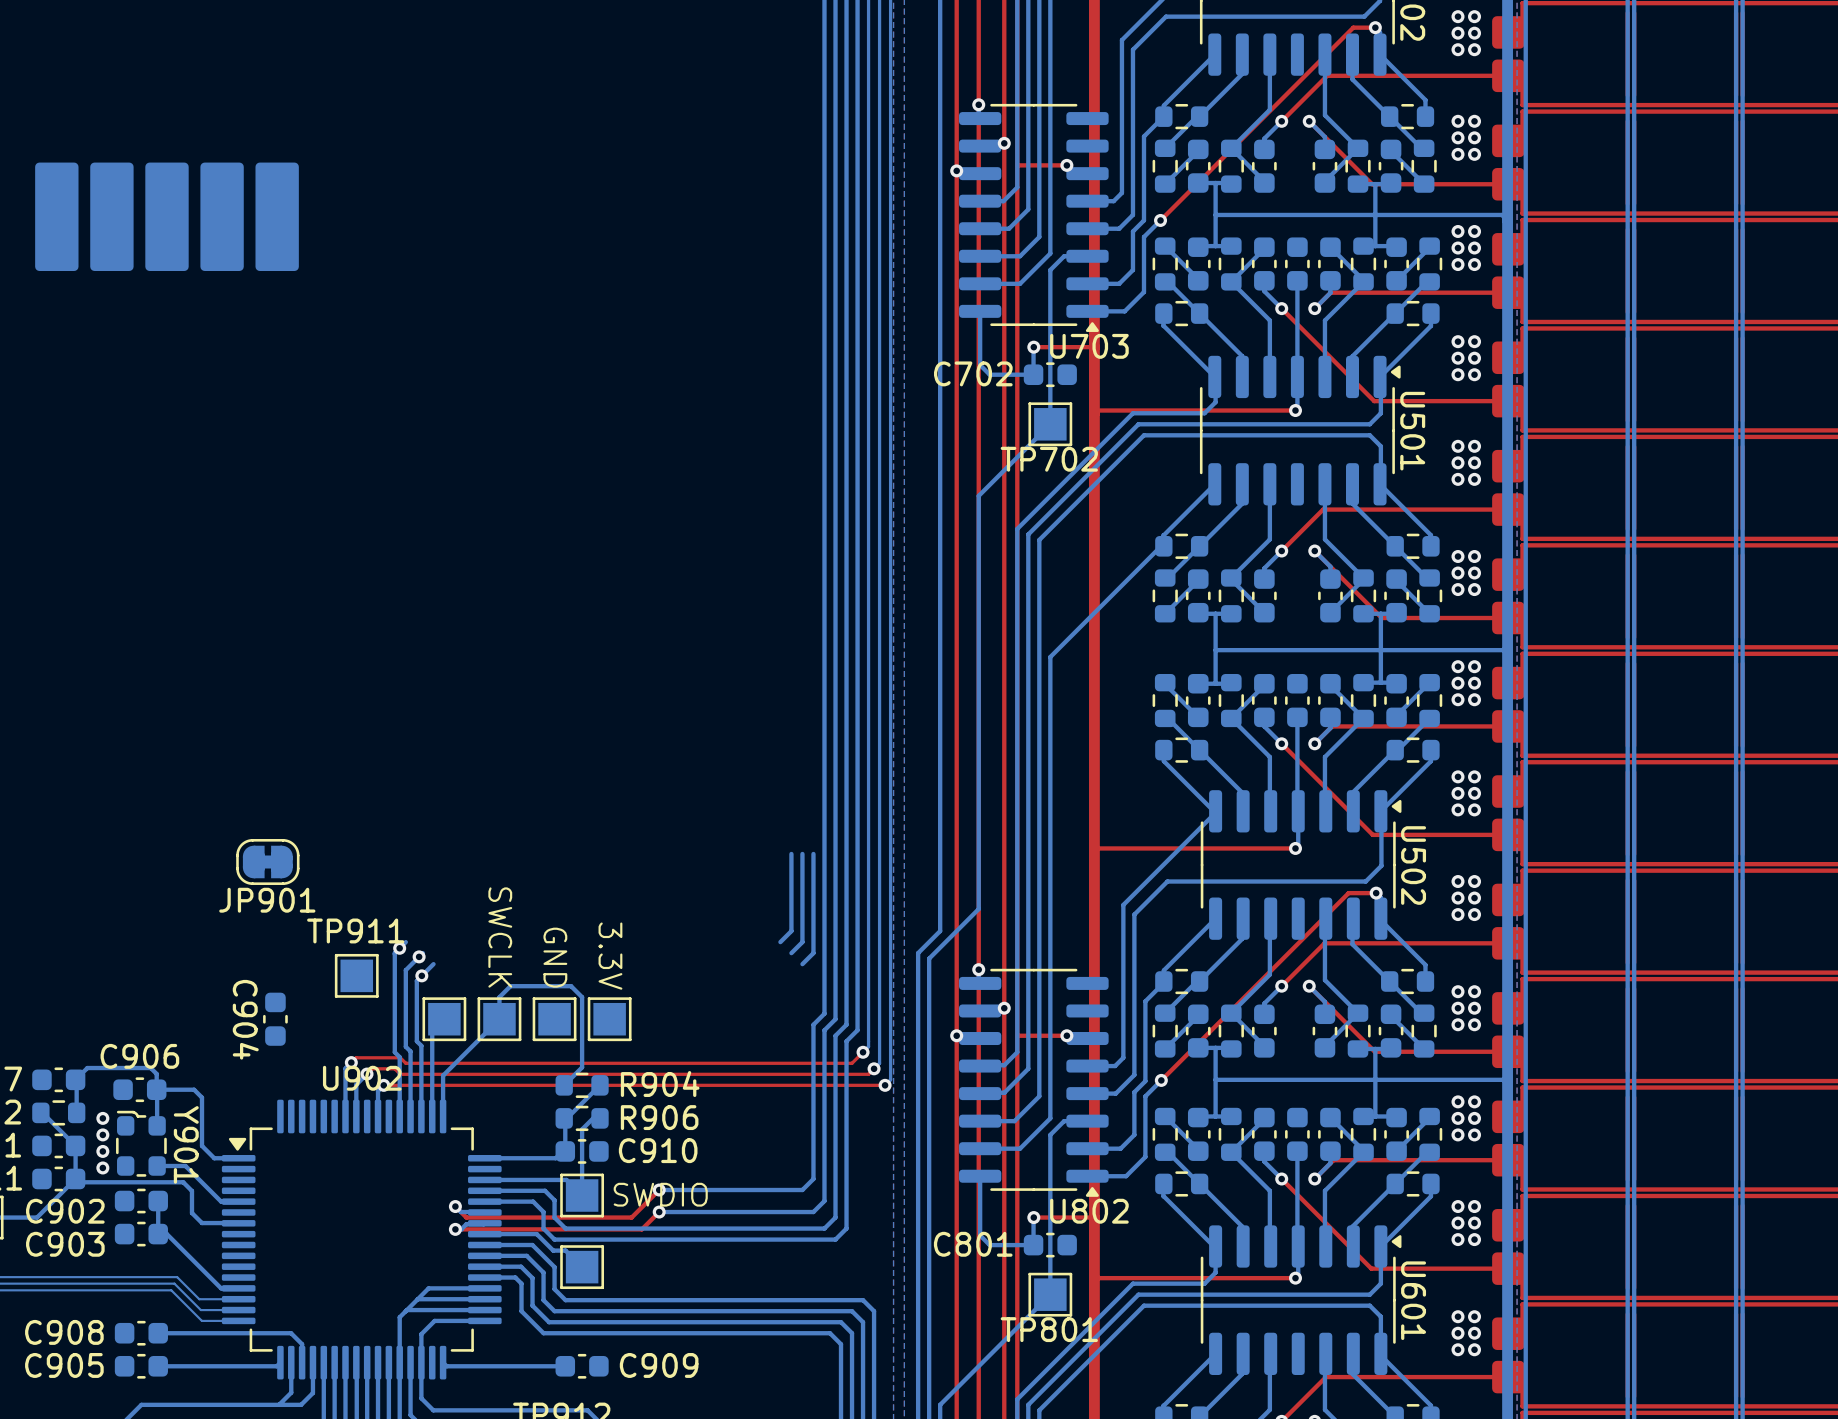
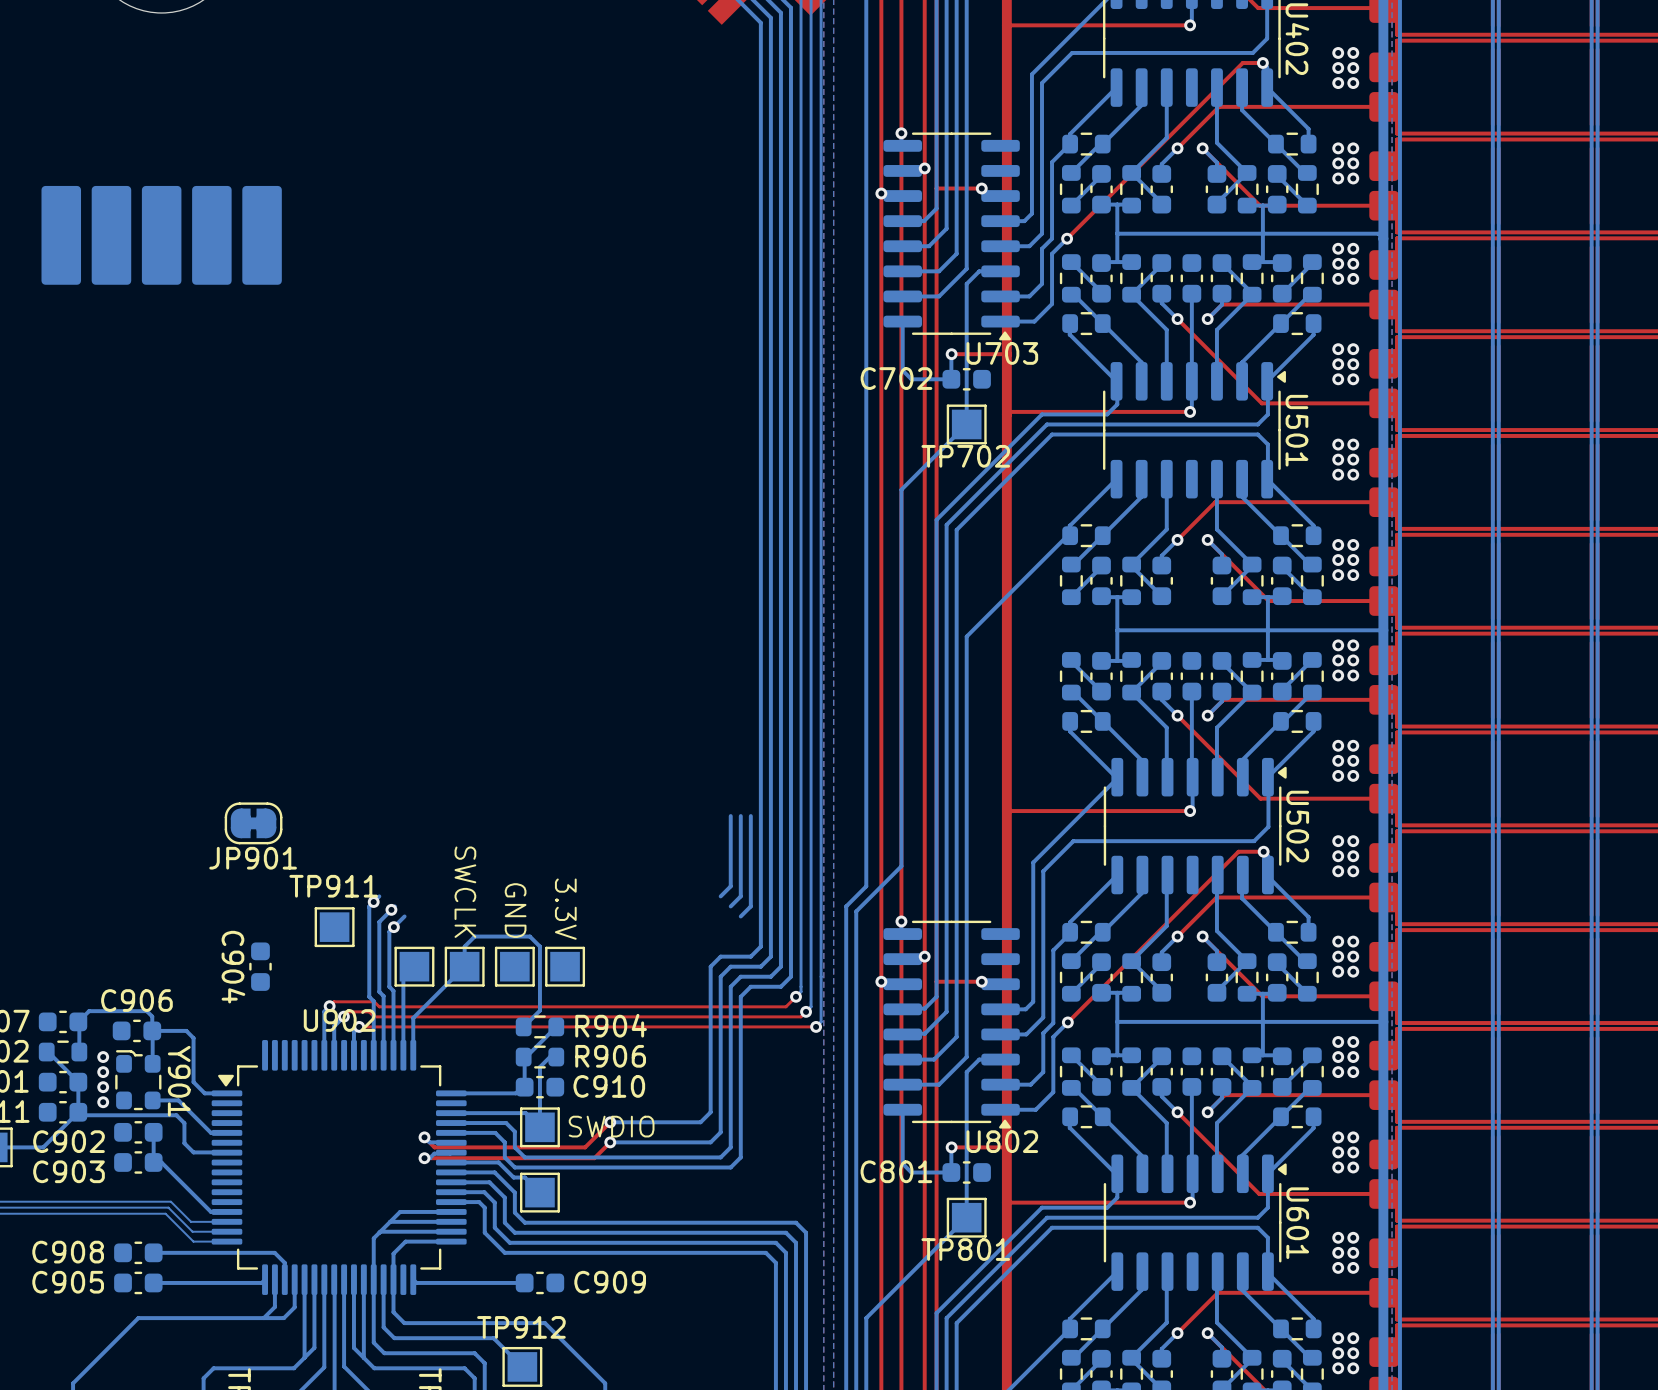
bottom track: (824, 997) (824, 1013) (813, 1024) (813, 1178) (802, 1190) (758, 1190) -> (760, 946) (750, 956) (720, 956) (710, 966) (710, 1112) (700, 1122)
bottom track: (835, 1008) (835, 1019) (824, 1030) (824, 1201) (813, 1212) (769, 1212) -> (770, 956) (760, 966) (730, 966) (720, 976) (720, 1132) (710, 1142)
bottom track: (846, 1019) (846, 1024) (835, 1035) (835, 1217) (824, 1228) (780, 1228) -> (780, 966) (770, 976) (740, 976) (730, 986) (730, 1147) (720, 1157)
bottom track: (846, 1041) (846, 1228) (835, 1239) (791, 1239) -> (780, 986) (750, 986) (740, 996) (740, 1157) (730, 1167)

